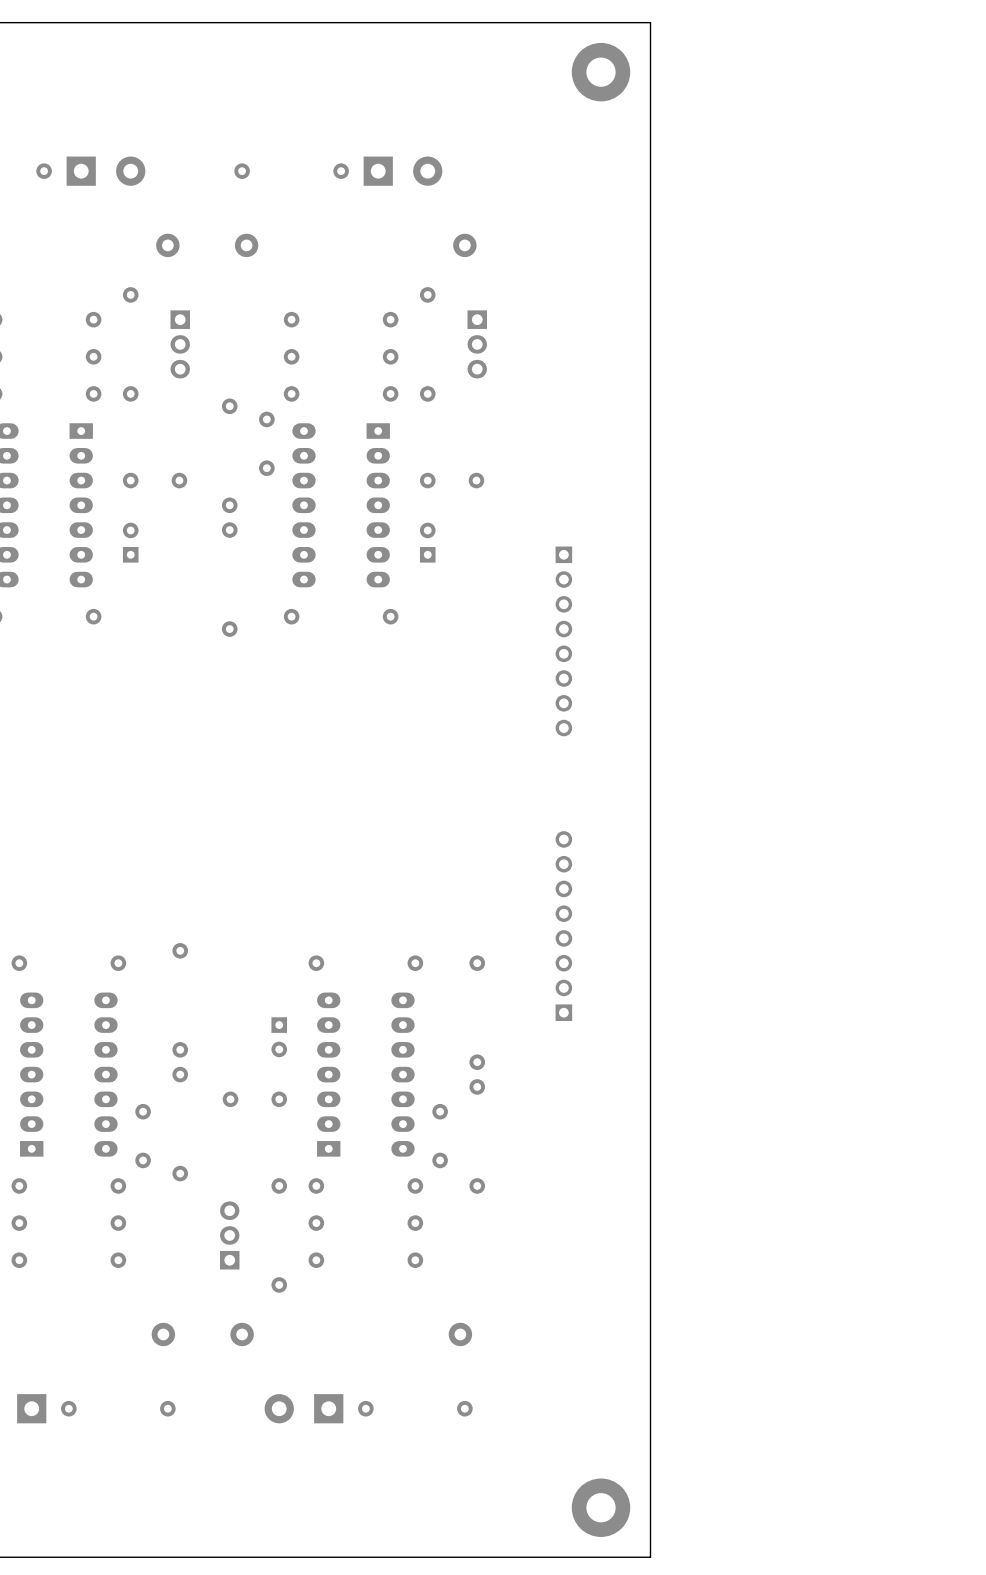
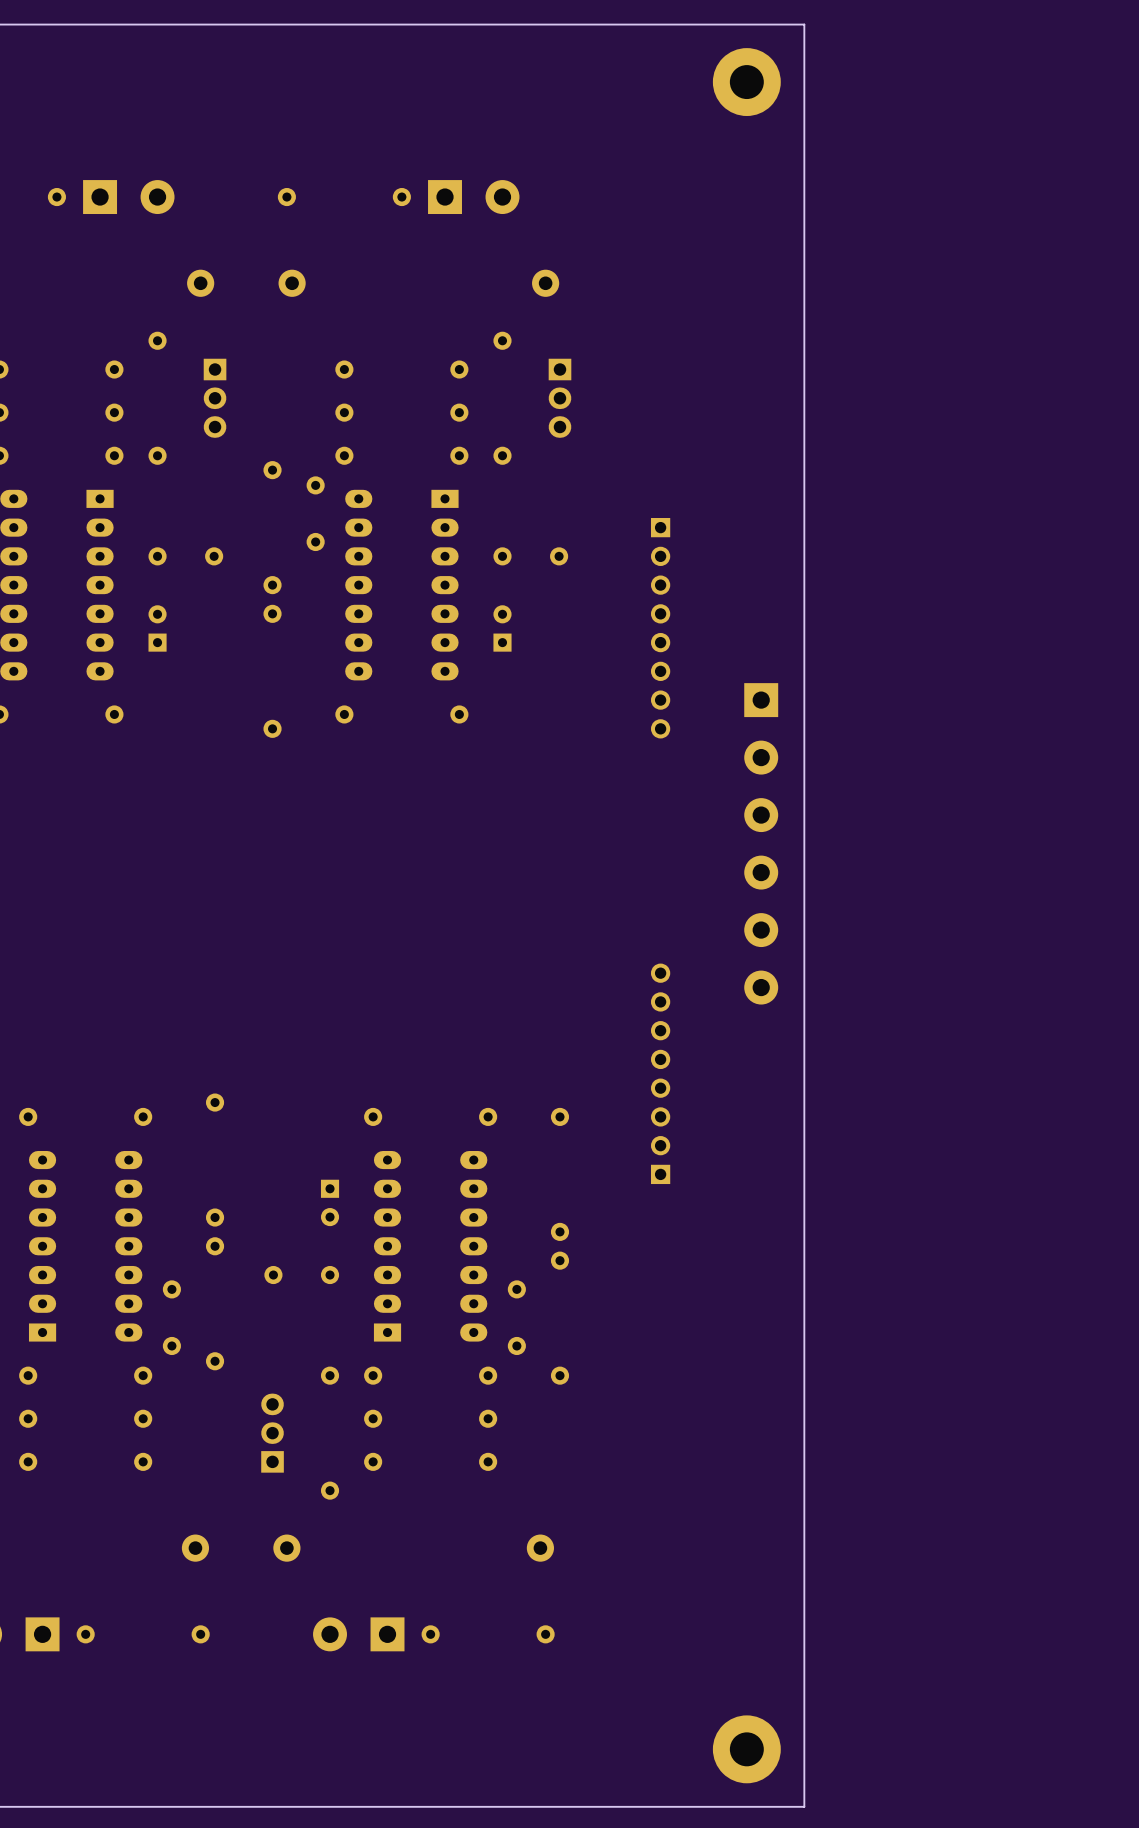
board edge: (650, 22) (650, 1557) -> (761, 24) (804, 24) (804, 1806) (761, 1806)
part position: (601, 72) -> (746, 82)
part position: (563, 641) -> (660, 628)
part: none -> (761, 843)
part position: (601, 1507) -> (746, 1749)

